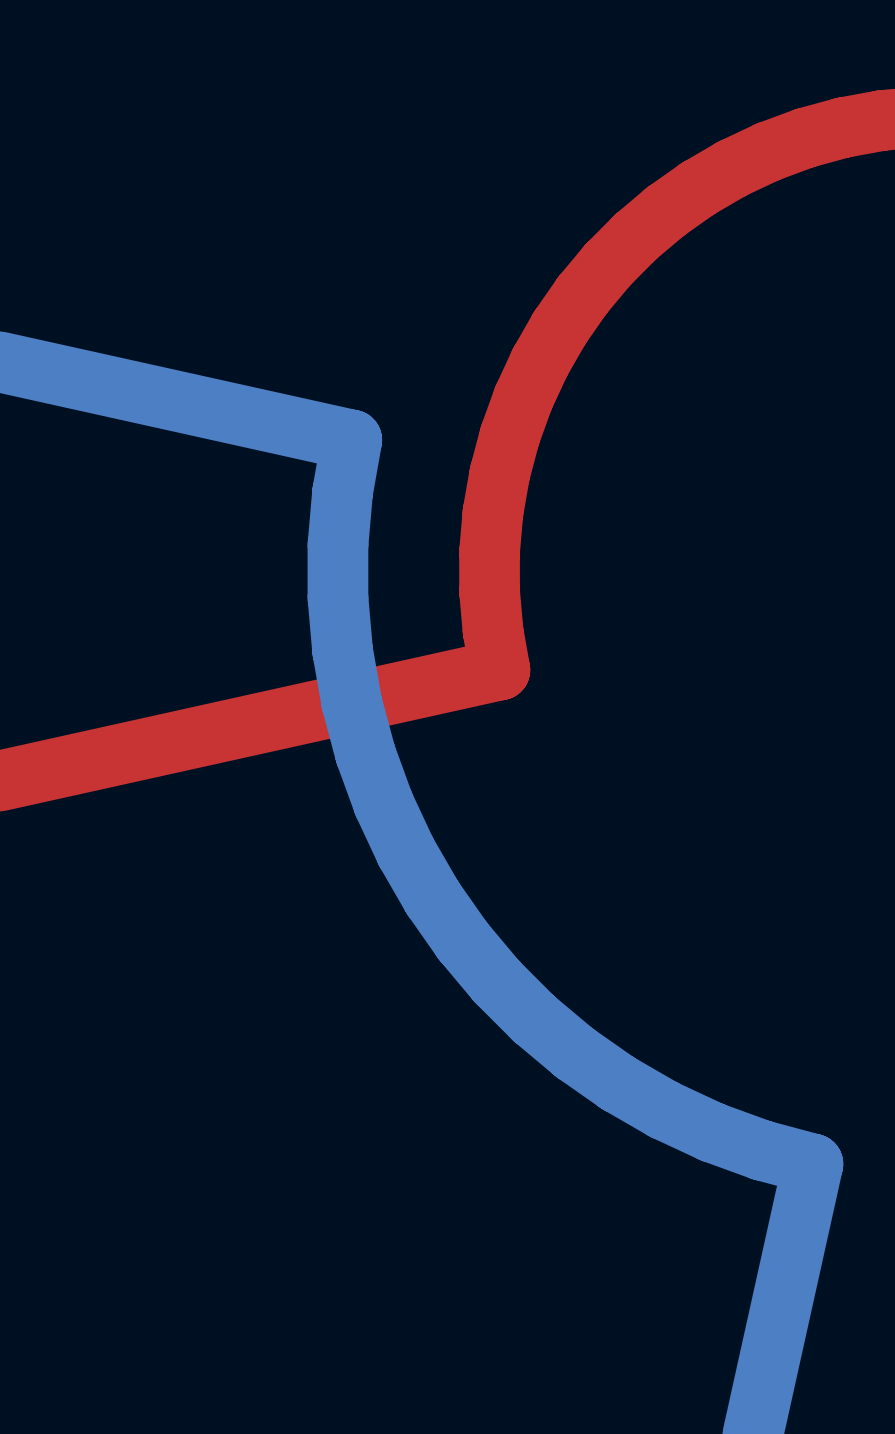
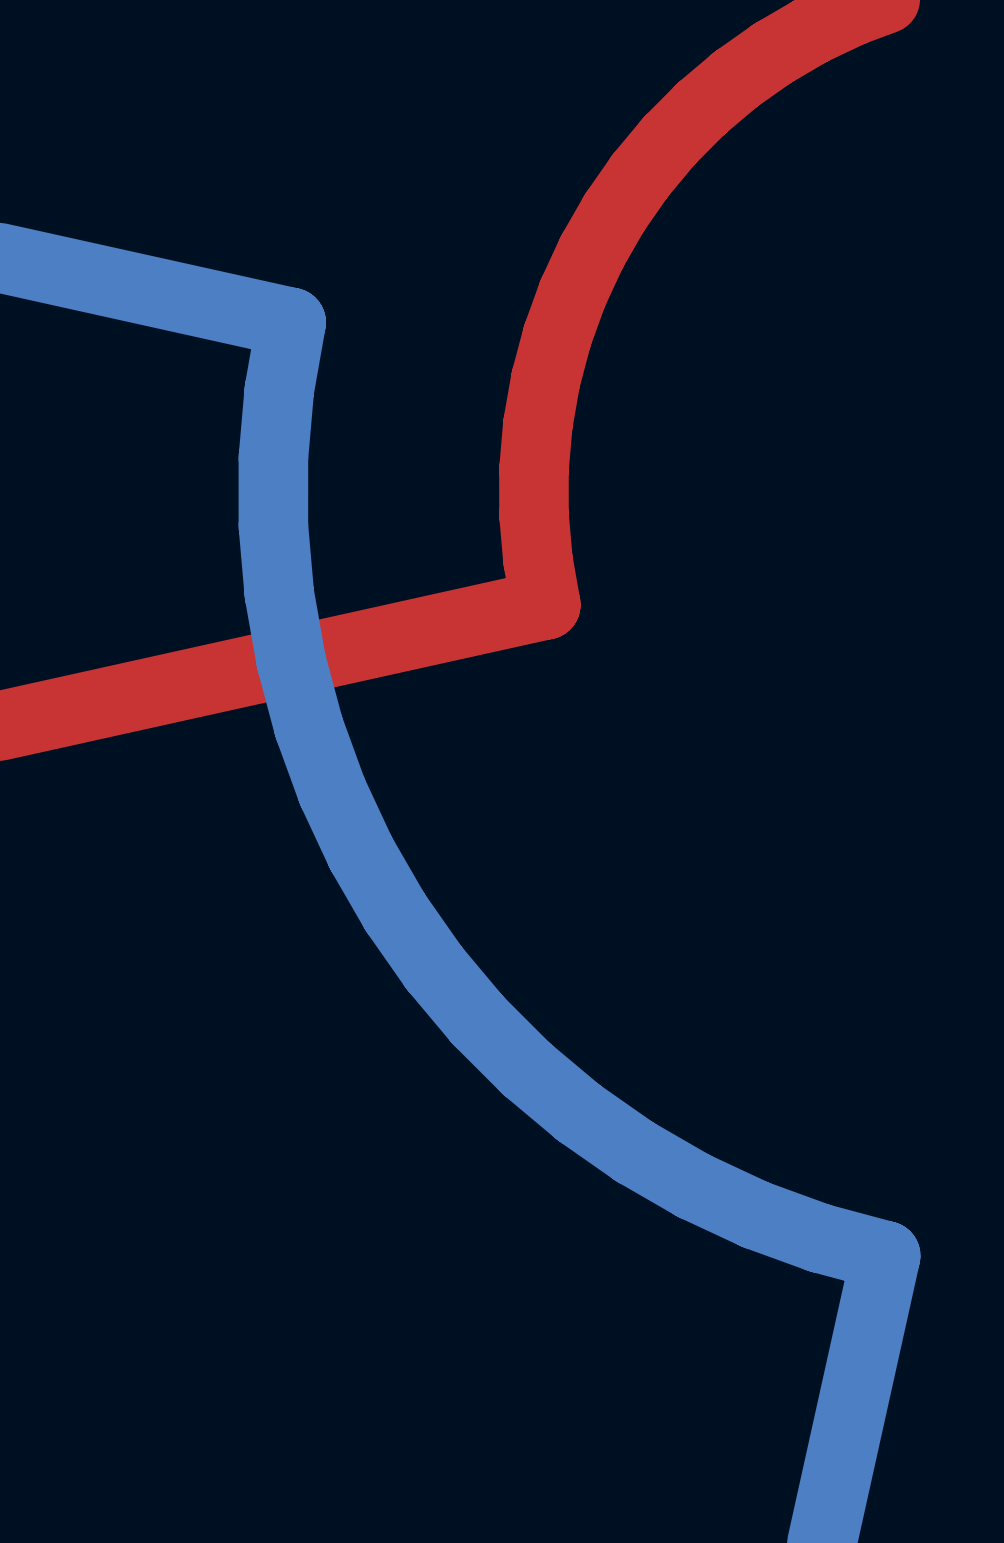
bottom track: (277, 423) (351, 440) (342, 492) (337, 544) (337, 597) (342, 650) (351, 702) (365, 753) (383, 803) (405, 851) (432, 897) (462, 940) (496, 981) (534, 1018) (574, 1052) (618, 1083) (664, 1109) (712, 1132) (761, 1150) (812, 1164) (796, 1238) -> (291, 322) (279, 389) (273, 457) (273, 525) (279, 593) (291, 661) (308, 727) (332, 791) (361, 853) (395, 912) (434, 968) (478, 1020) (526, 1068) (578, 1112) (634, 1151) (693, 1185) (755, 1214) (819, 1238) (885, 1255)

